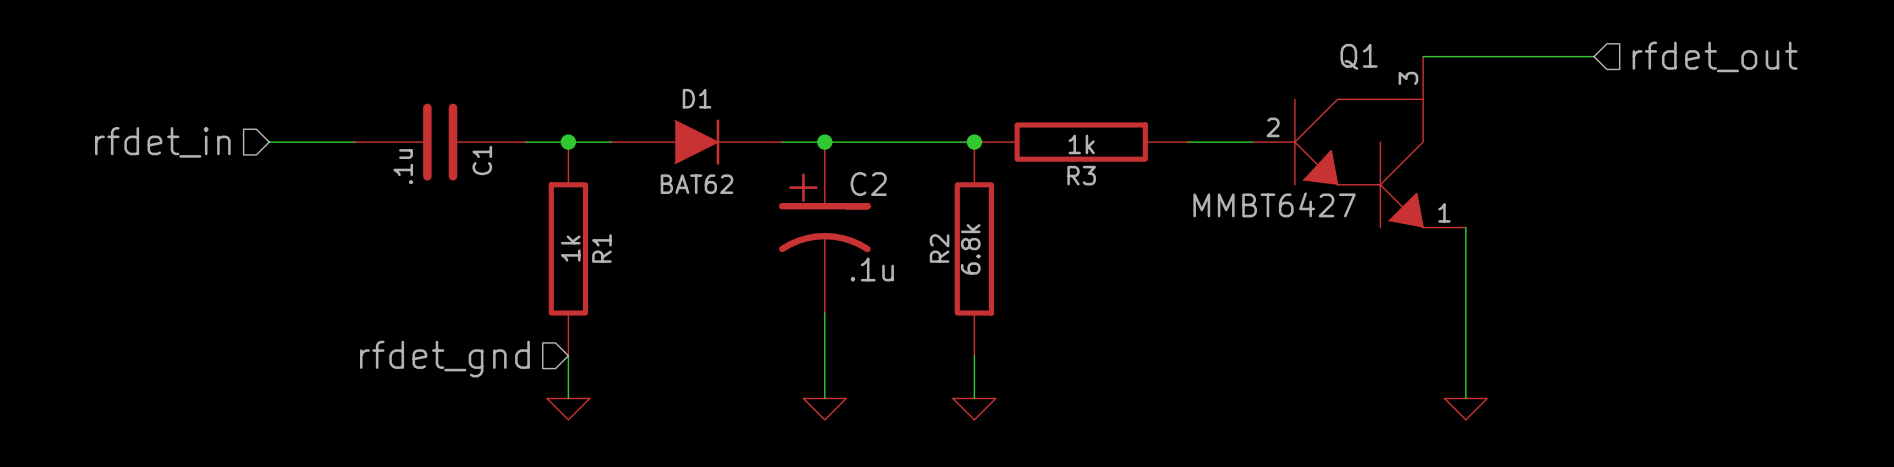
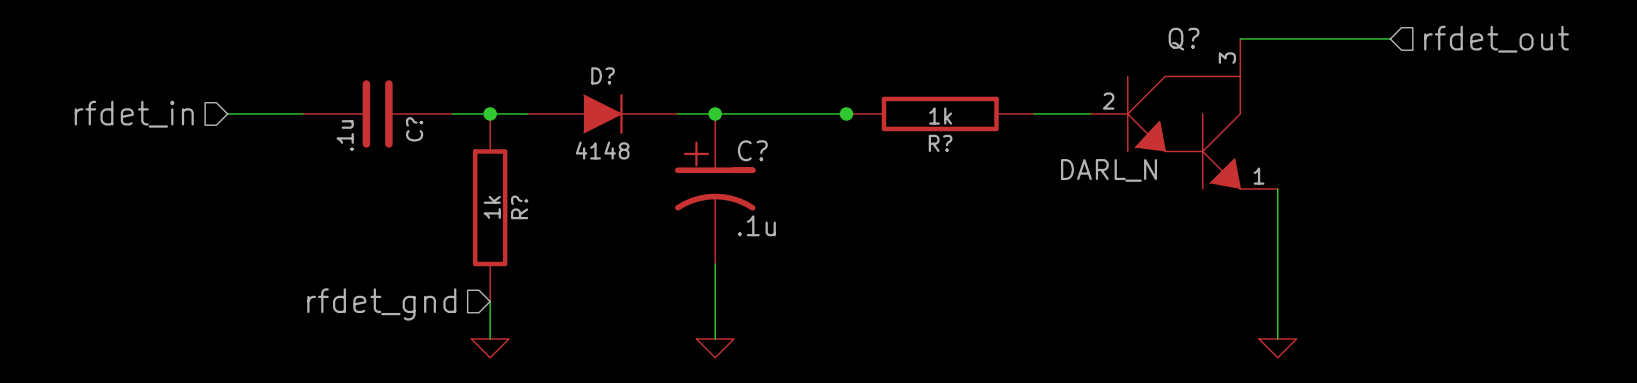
Q1 name: Q1 (1359, 56) -> Q? (1184, 39)
D1 name: D1 (697, 98) -> D? (603, 75)
C1 name: C1 (482, 160) -> C? (414, 129)
R3 name: R3 (1081, 175) -> R? (940, 143)
D1 value: BAT62 (697, 184) -> 4148 (602, 150)
C2 name: C2 (868, 184) -> C? (752, 150)
Q1 value: MMBT6427 (1274, 204) -> DARL_N (1109, 170)
R1 name: R1 (601, 248) -> R? (519, 207)
R2: 6.8k (974, 248) -> none
wire: (974, 355) (974, 398) -> none
power symbol: (974, 409) -> none

